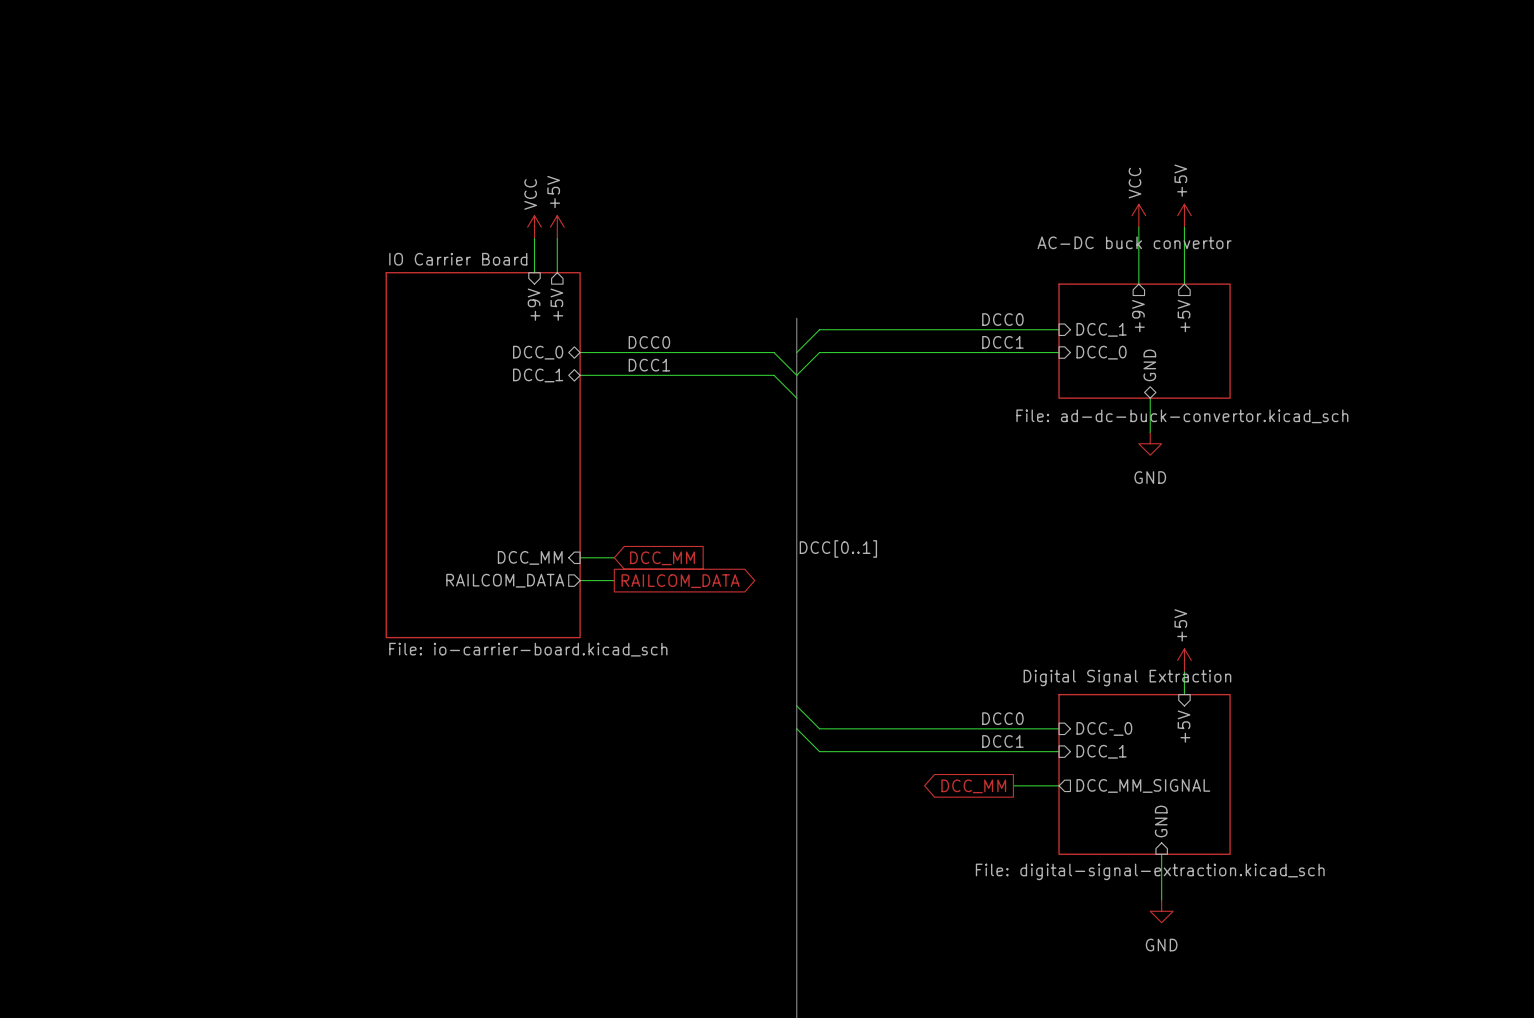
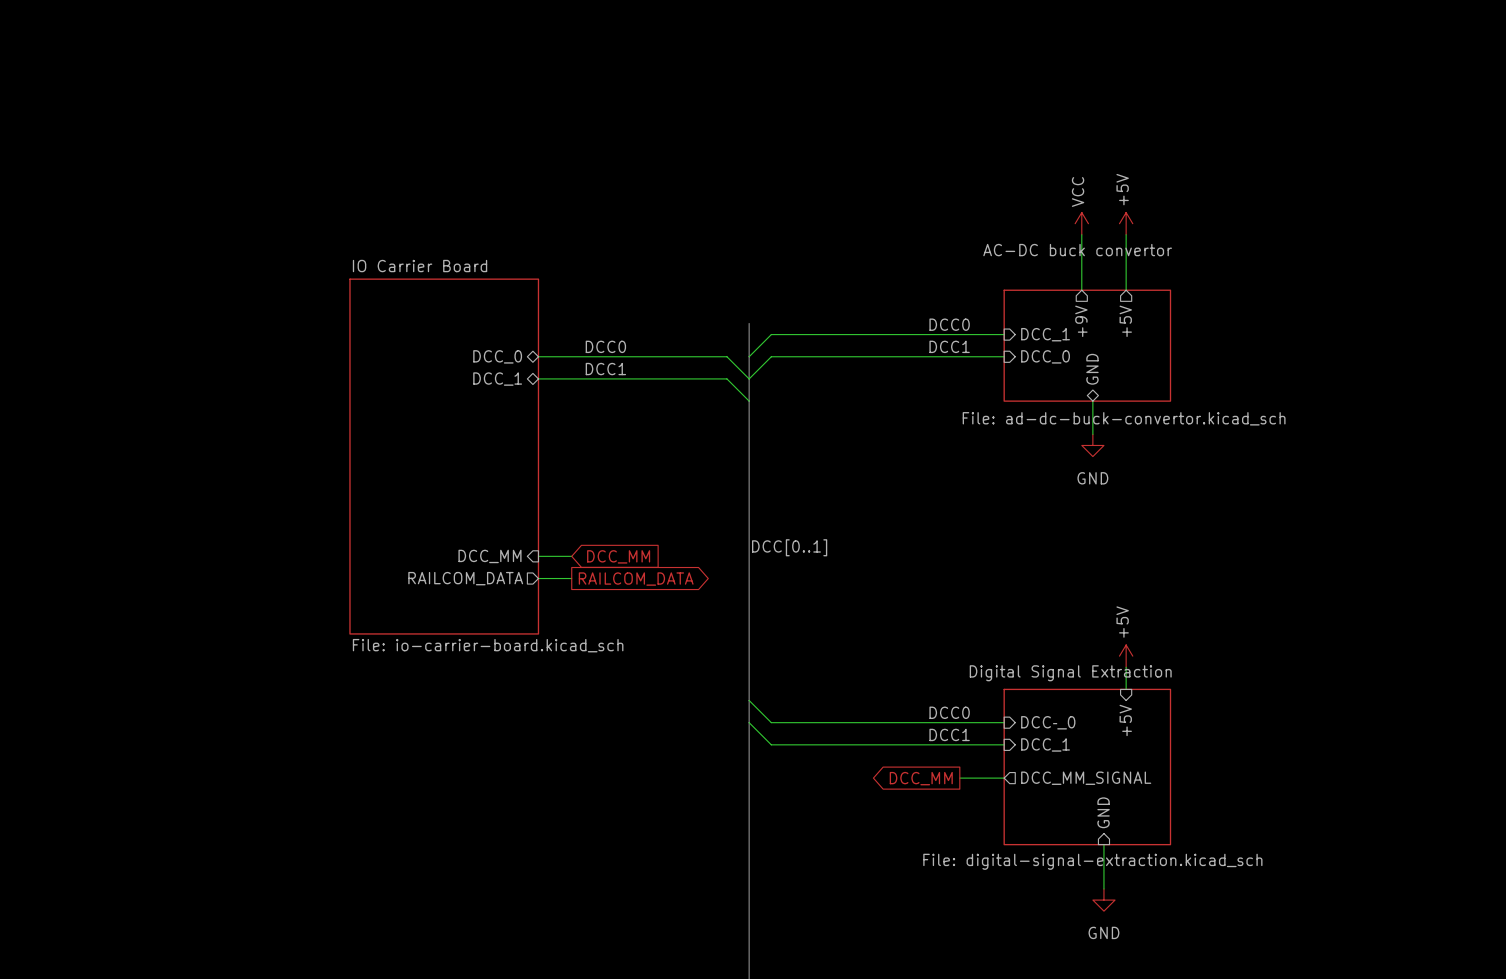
power symbol: VCC (534, 227) -> none
power symbol: +5V (557, 227) -> none
wire: (534, 238) (534, 272) -> none
wire: (557, 238) (557, 272) -> none
sheet pin: +9V (534, 304) -> none
sheet pin: +5V (556, 304) -> none

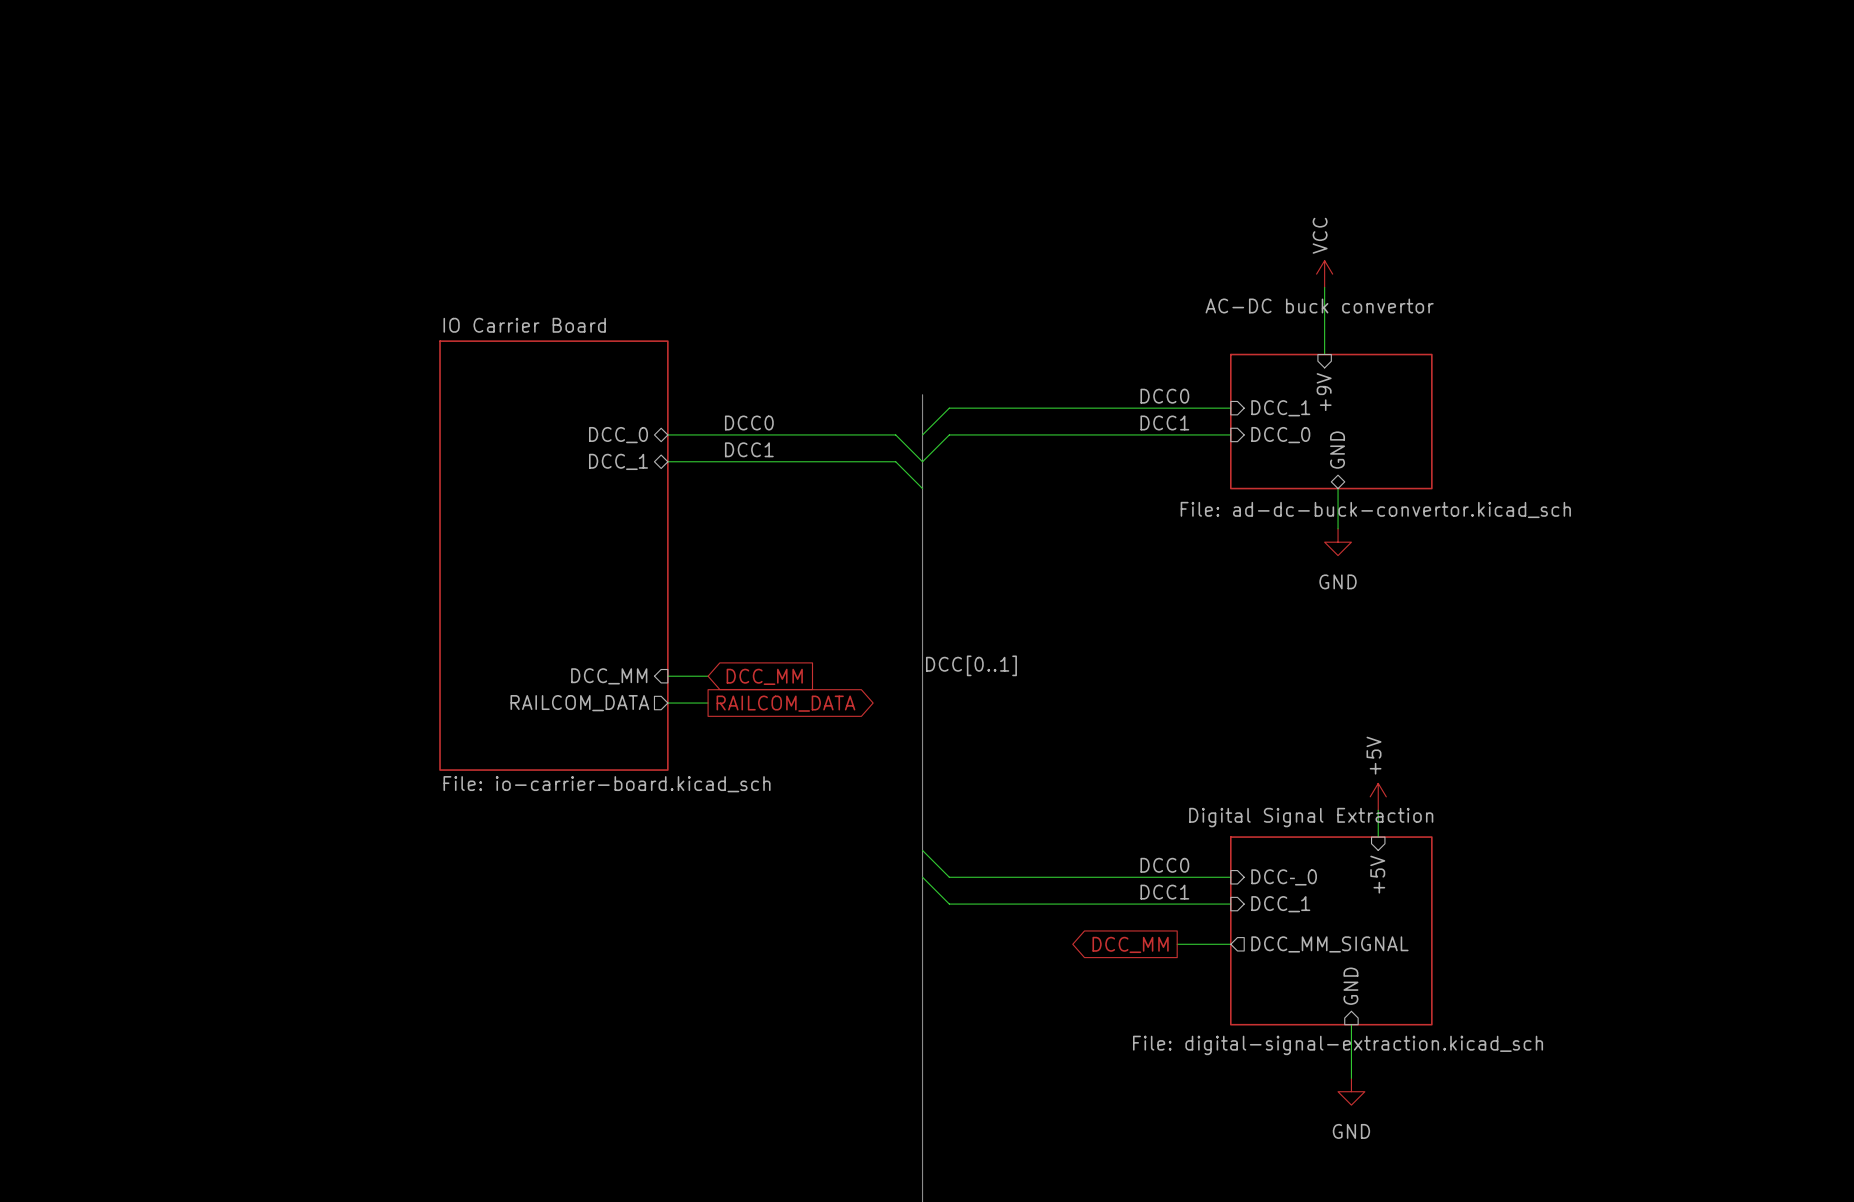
power symbol: +5V (1126, 223) -> none
wire: (1126, 234) (1126, 290) -> none
sheet pin shape: output (1081, 321) -> input (1324, 392)
sheet pin: +5V (1125, 321) -> none

